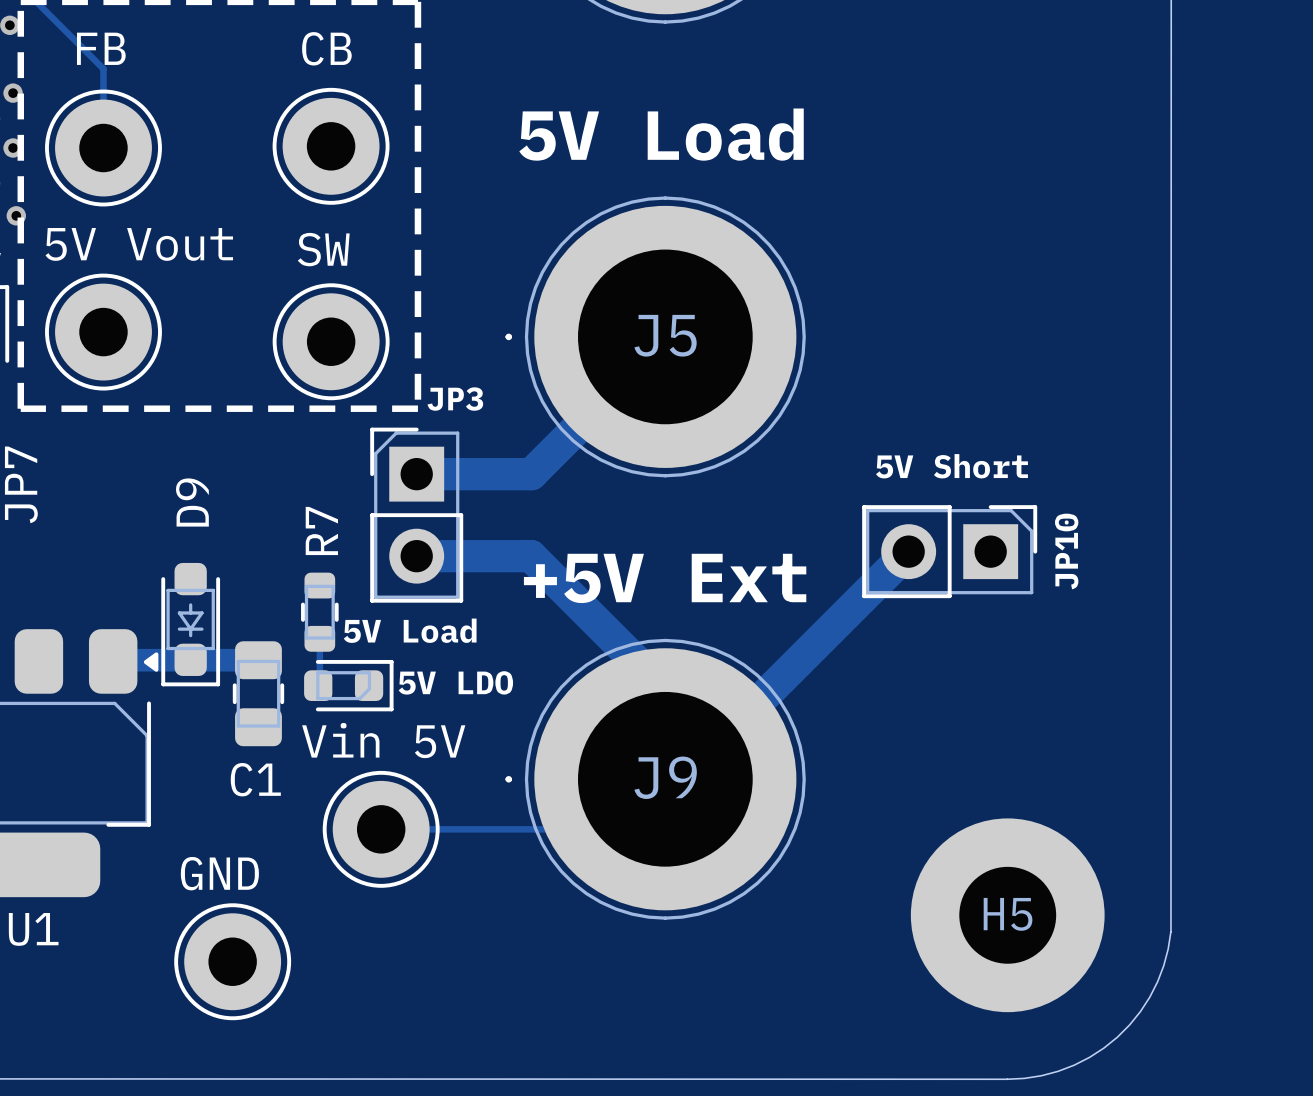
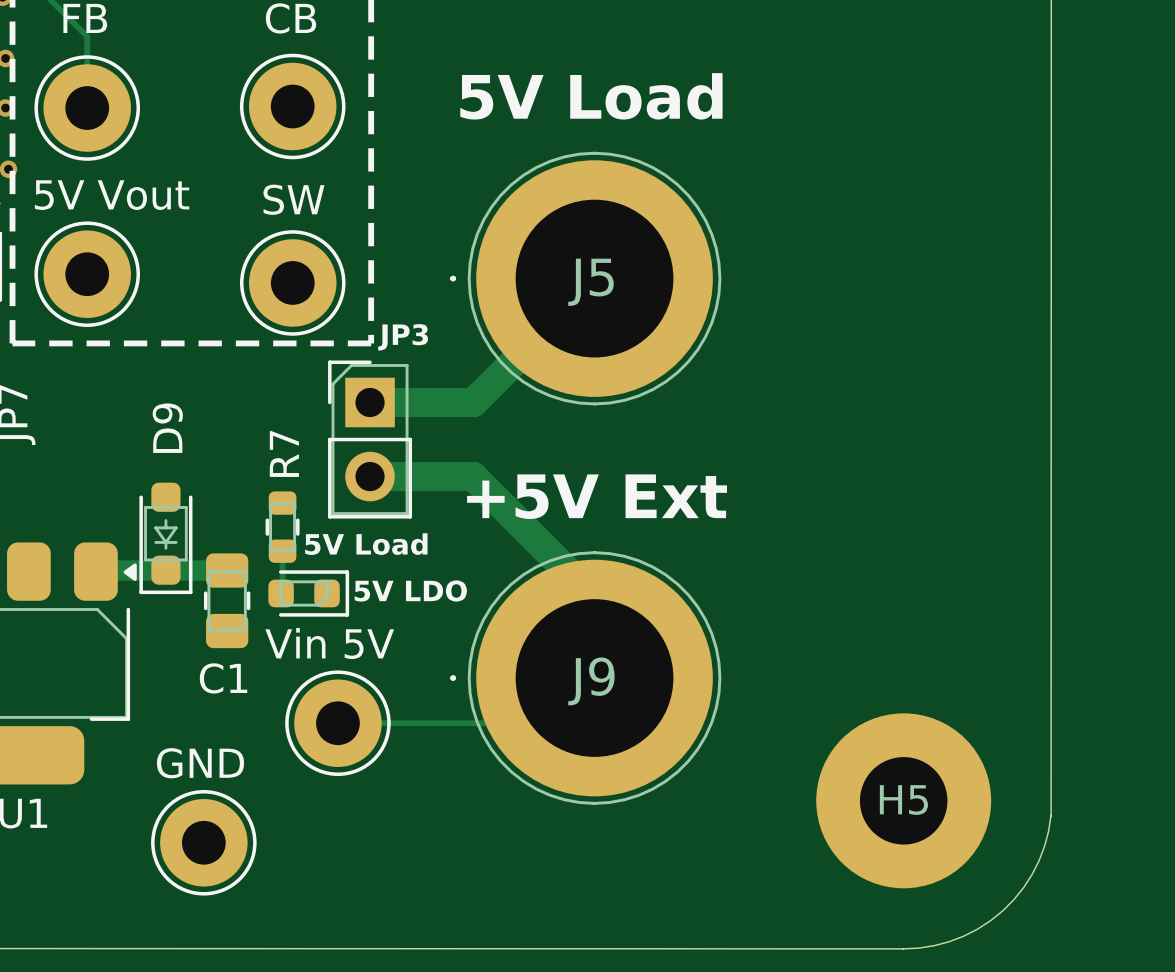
text: 5V Short (952, 466) -> none
track: (908, 551) (681, 779) (665, 779) -> none
JP10: (949, 551) -> none

